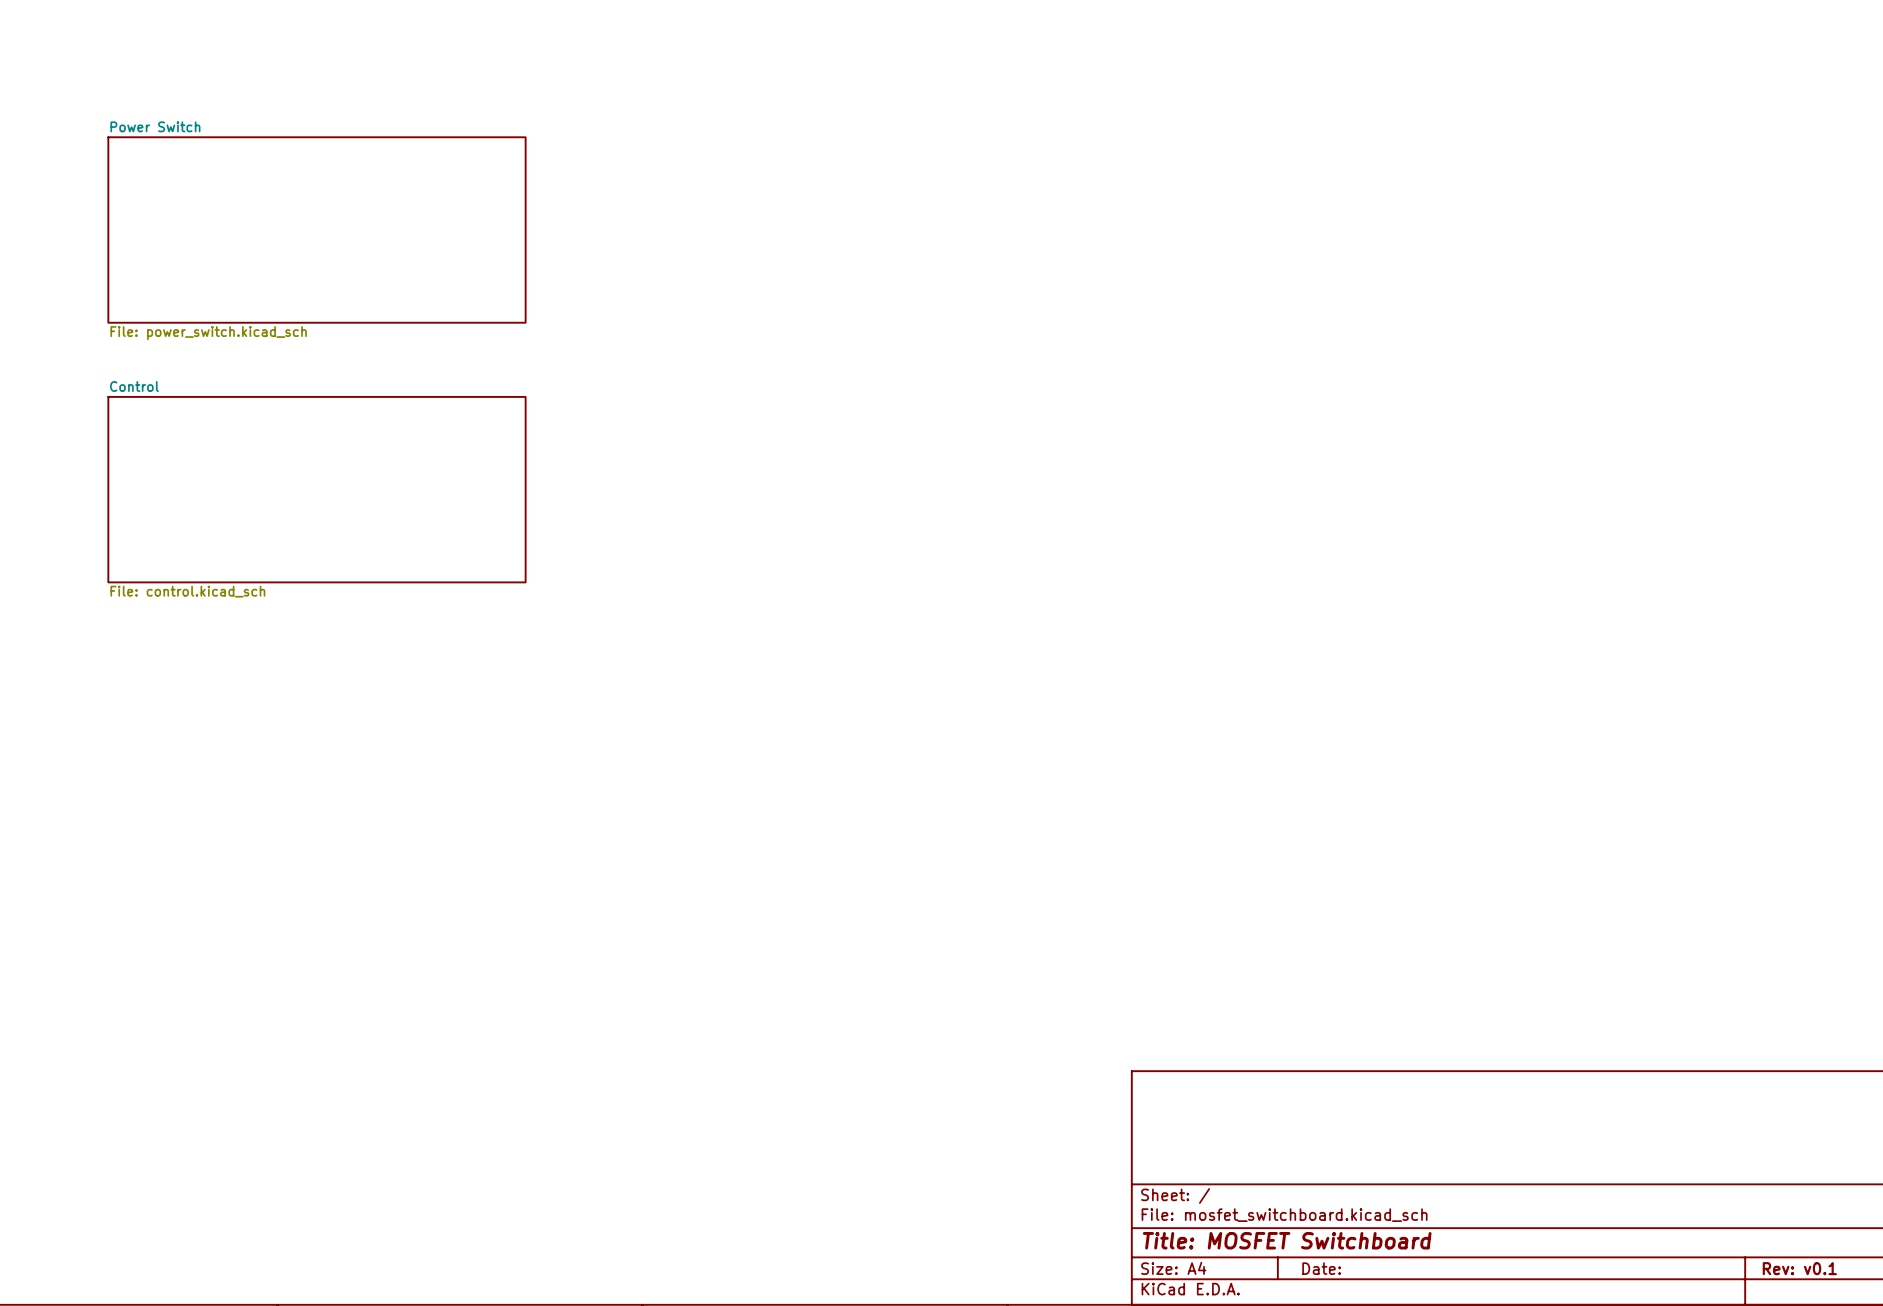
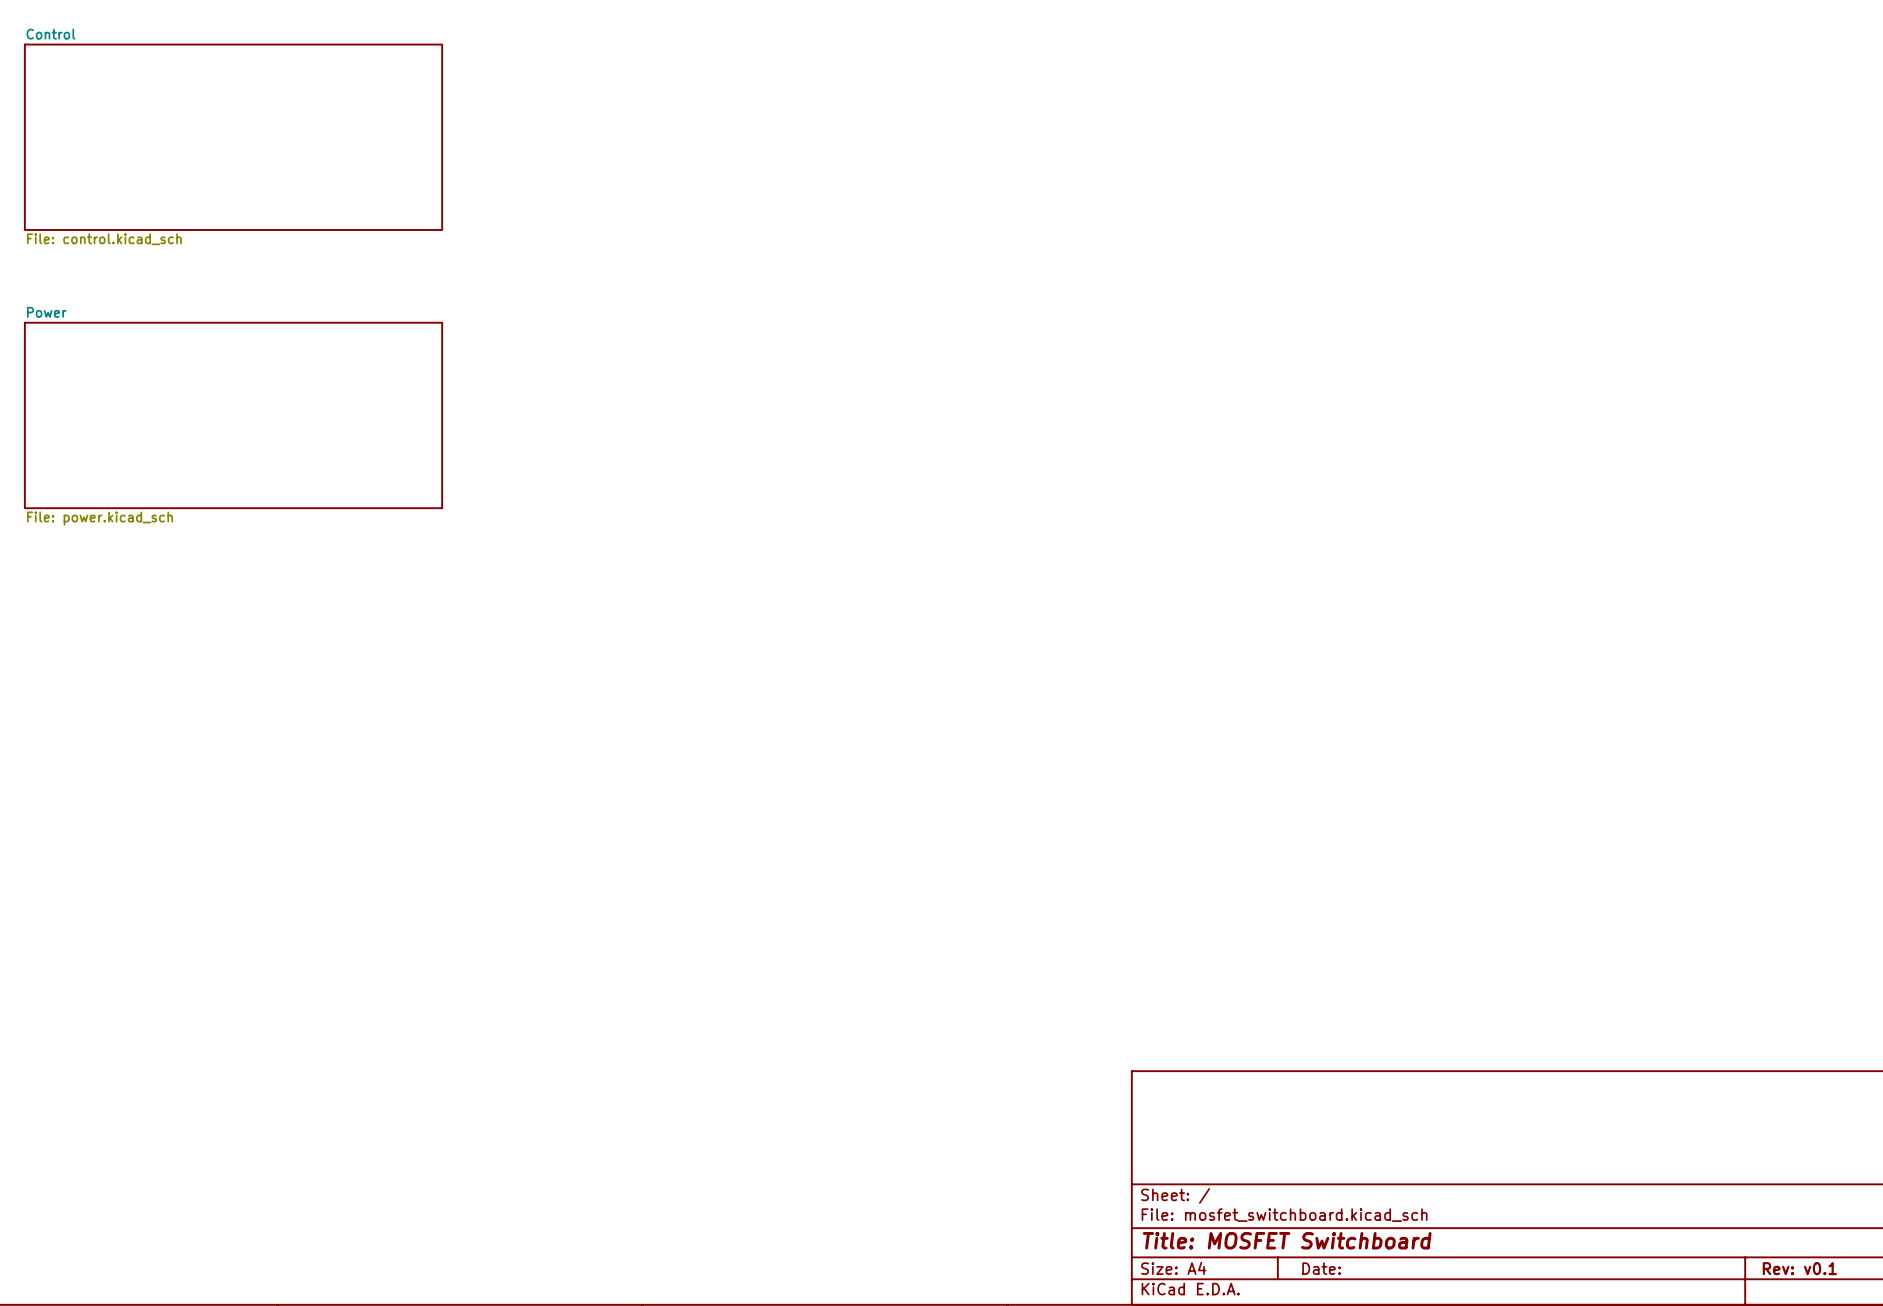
sheet Control: none -> File: control.kicad_sch (233, 137)
sheet Power Switch: File: power_switch.kicad_sch (316, 230) -> none
sheet Power: none -> File: power.kicad_sch (233, 415)
sheet Control: File: control.kicad_sch (316, 489) -> none

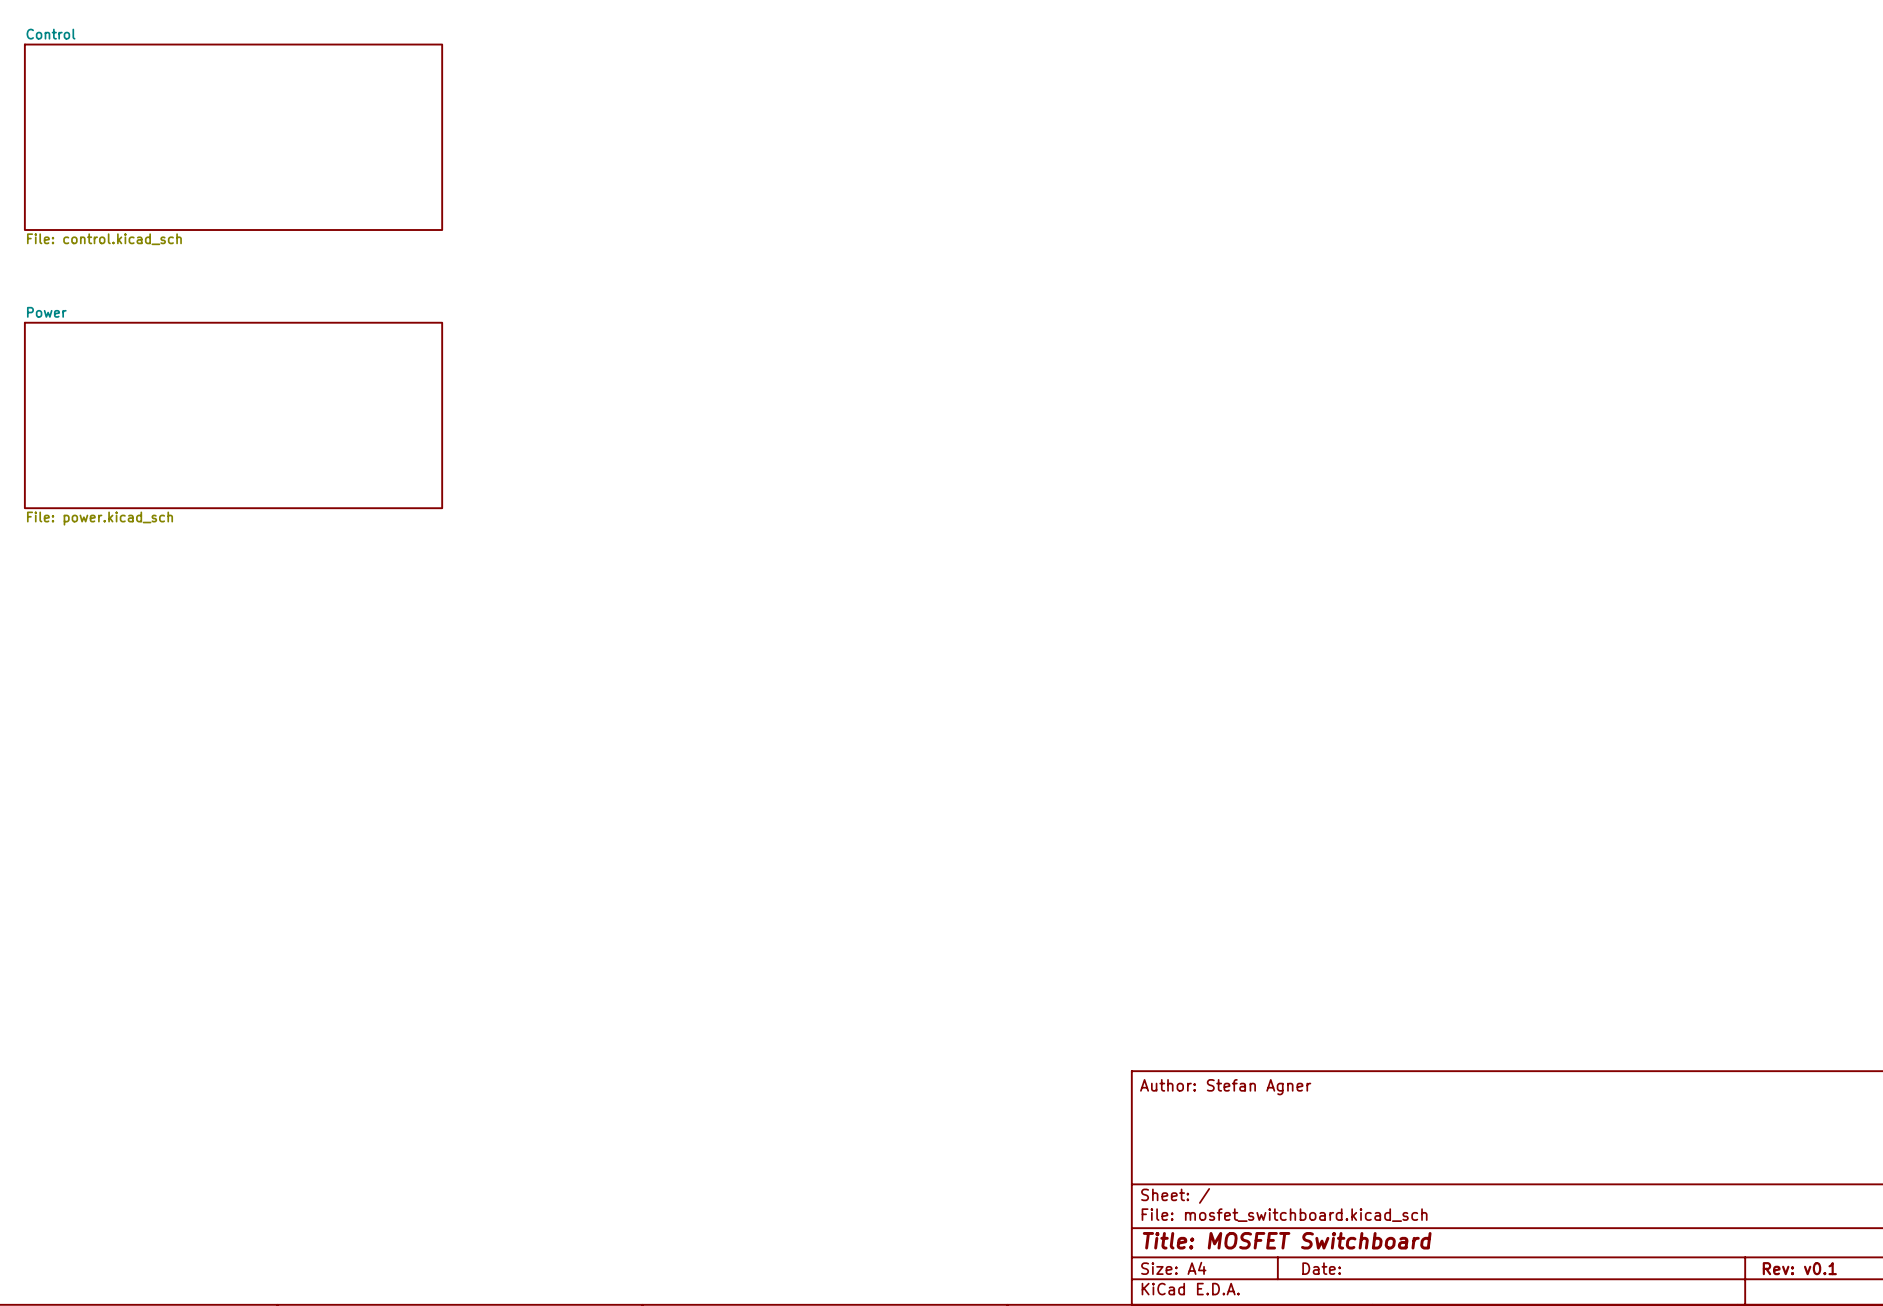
title block: none -> Author: Stefan Agner (1225, 1087)

